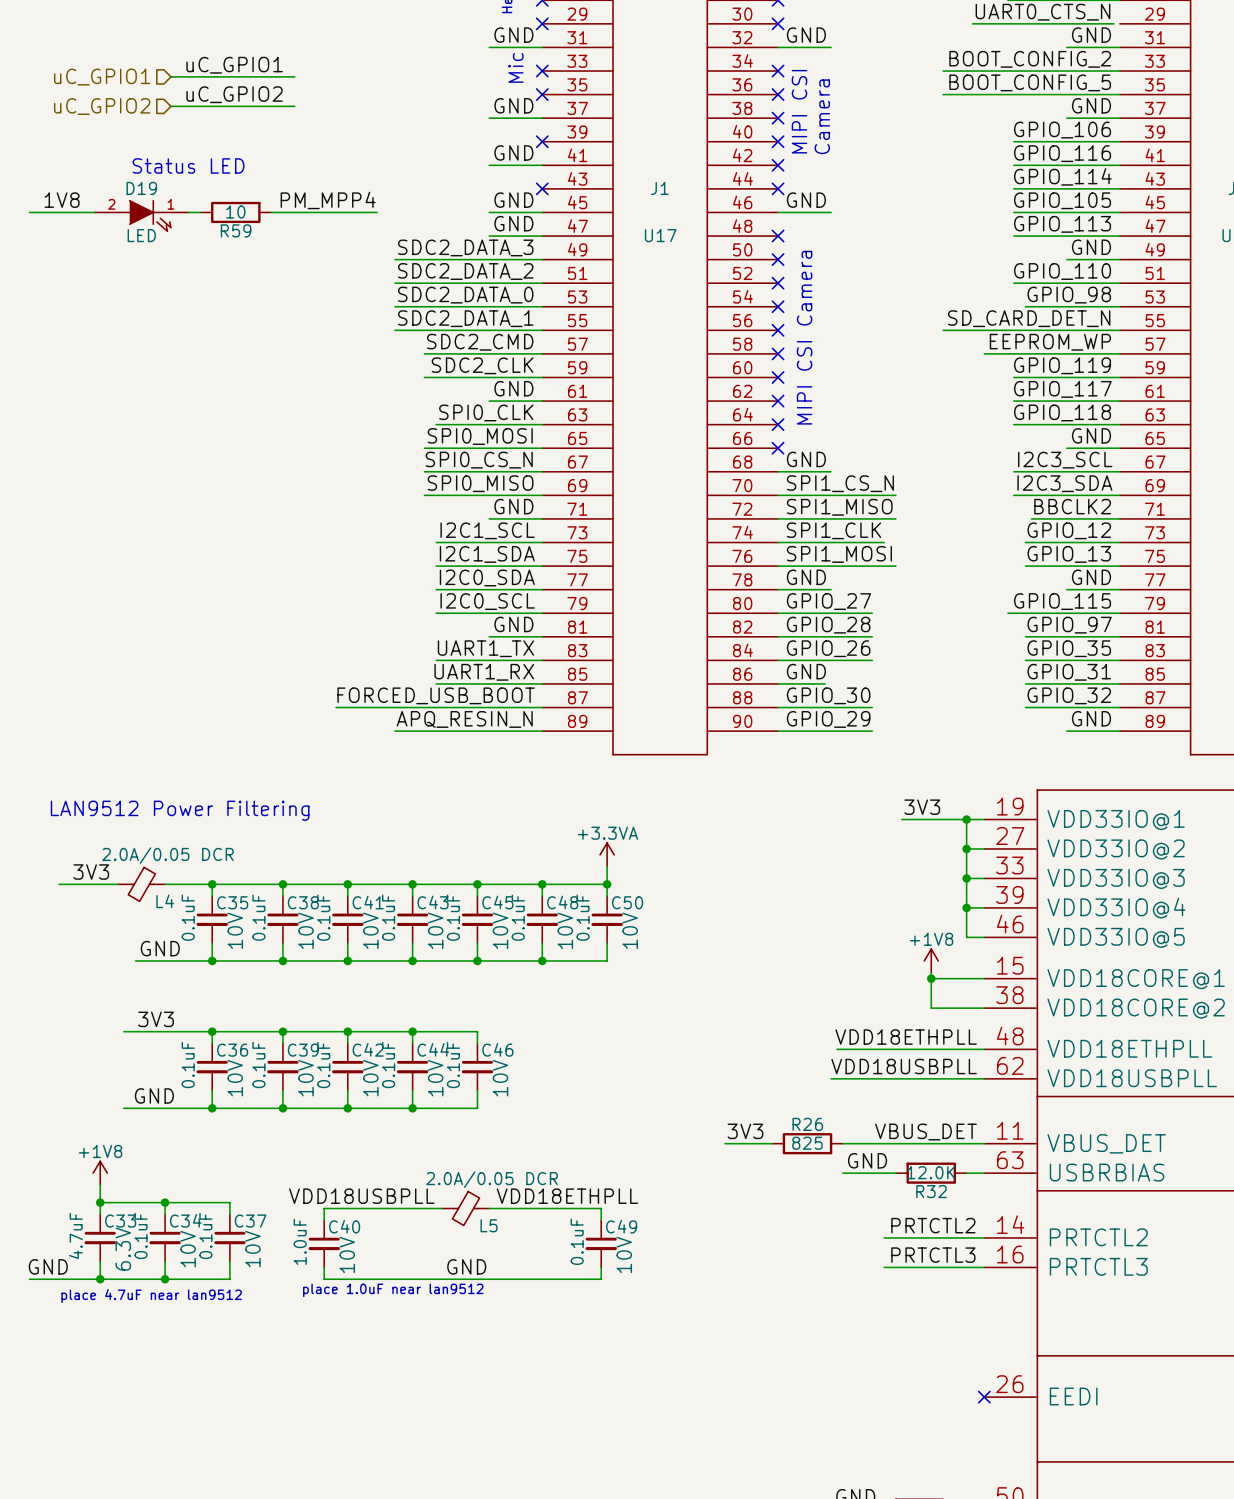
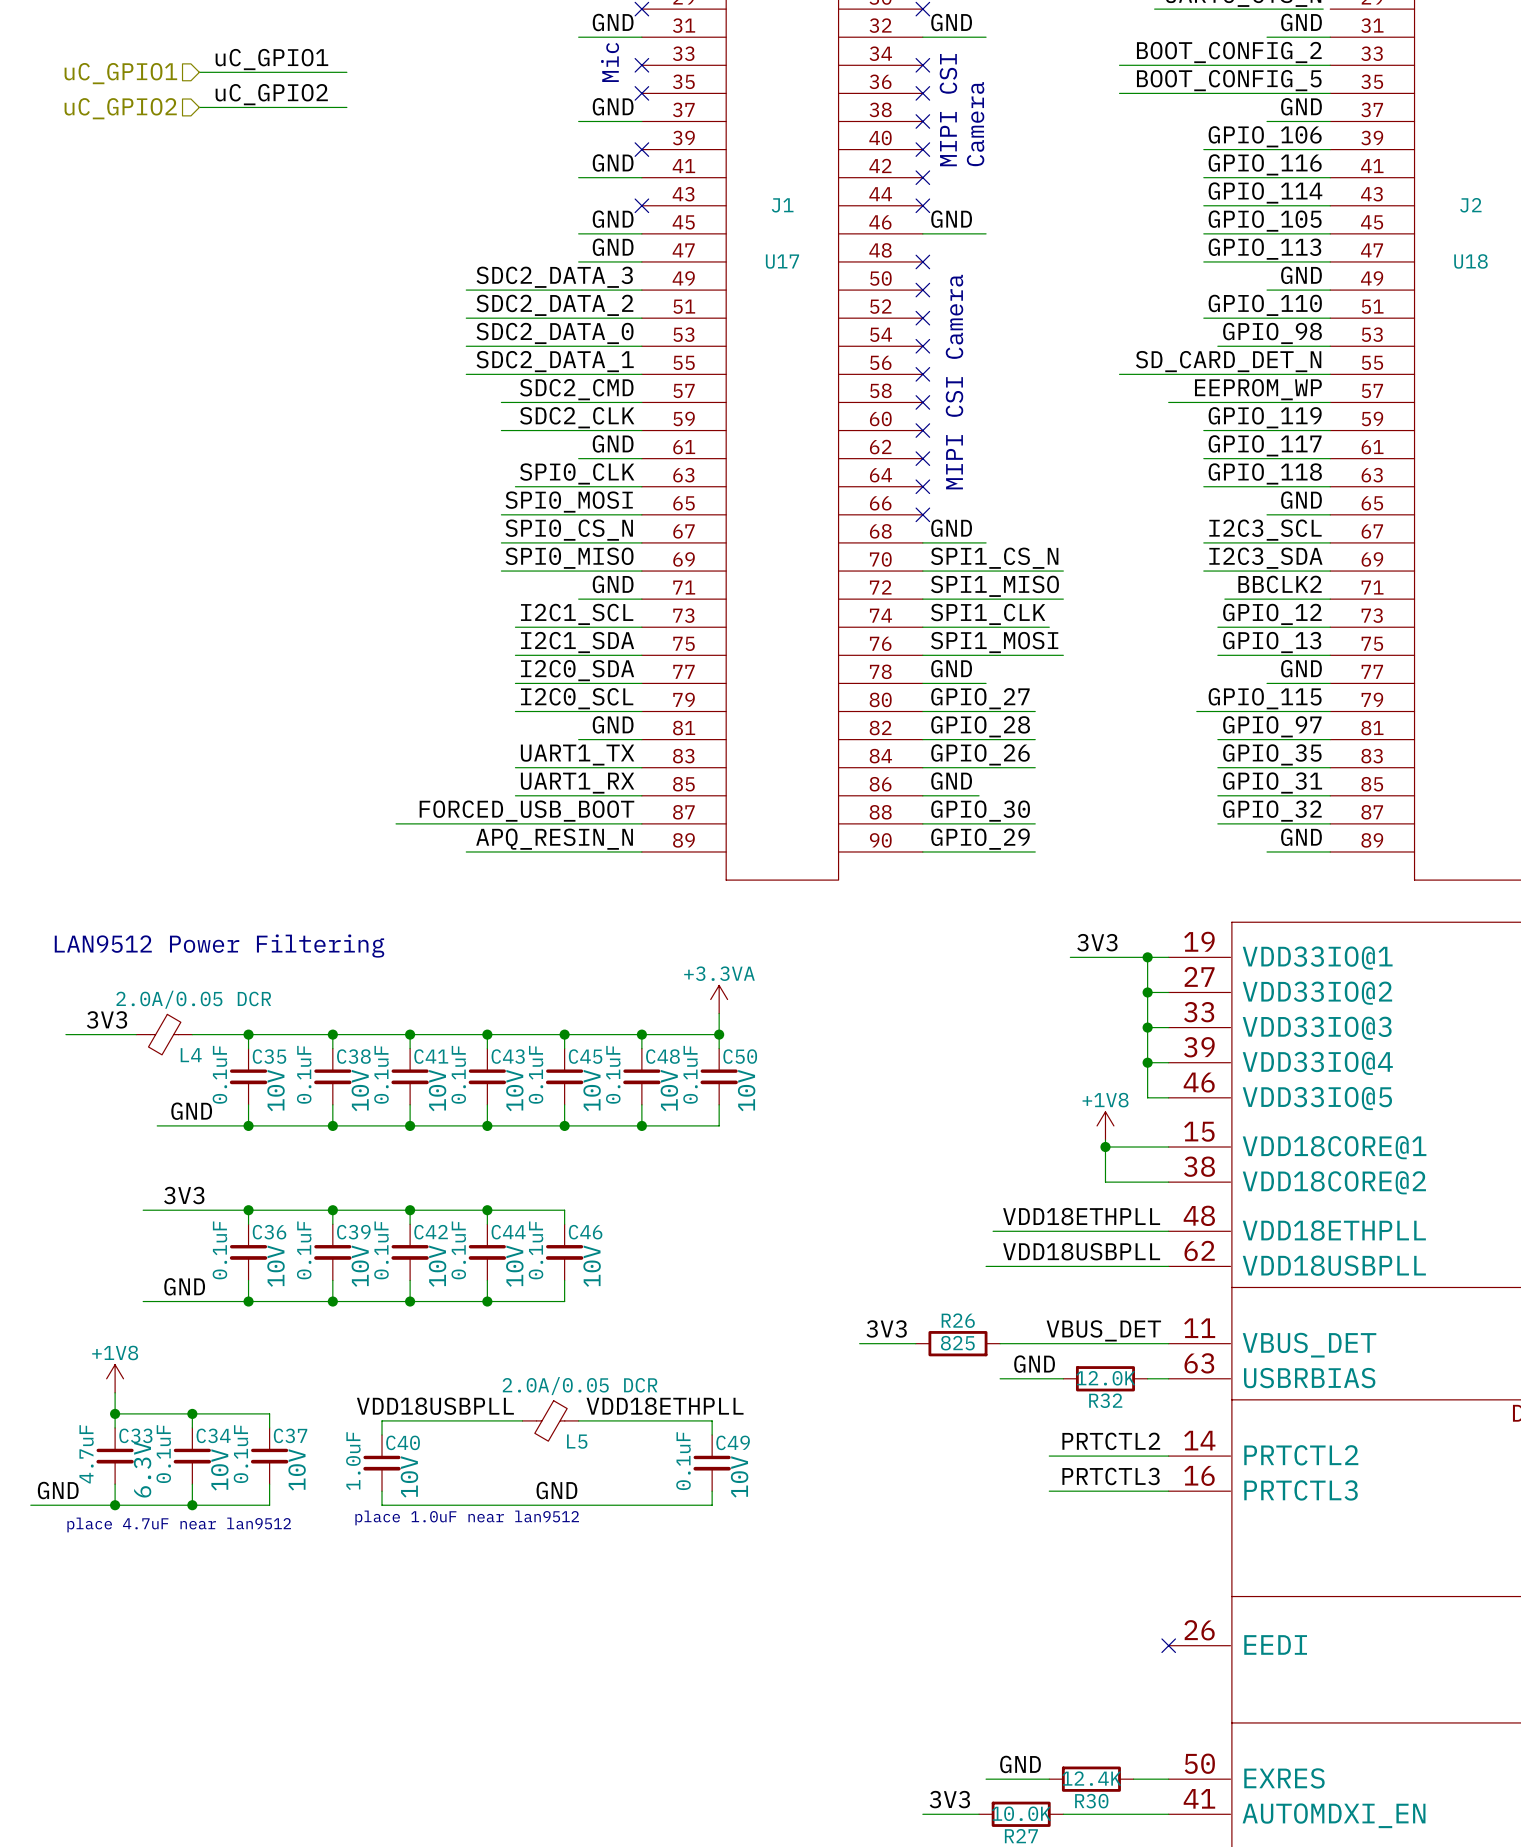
text: Status LED (188, 165) -> none
label: 1V8 (62, 200) -> none
label: PM_MPP4 (328, 200) -> none
wire: (29, 212) (94, 212) -> none
wire: (188, 212) (200, 212) -> none
R59: 10 (235, 212) -> none
wire: (271, 212) (377, 212) -> none
D19: LED (141, 215) -> none

